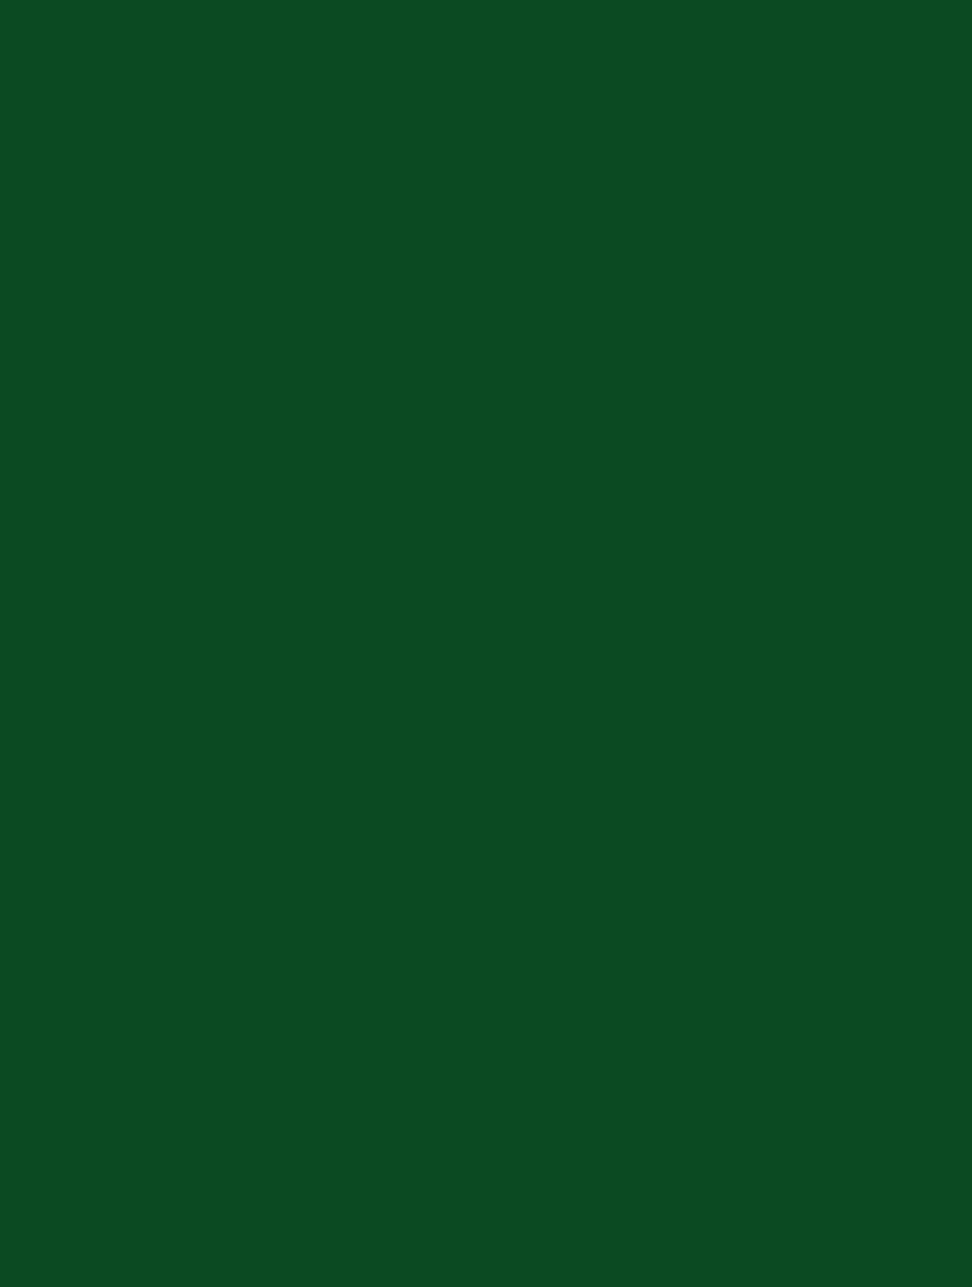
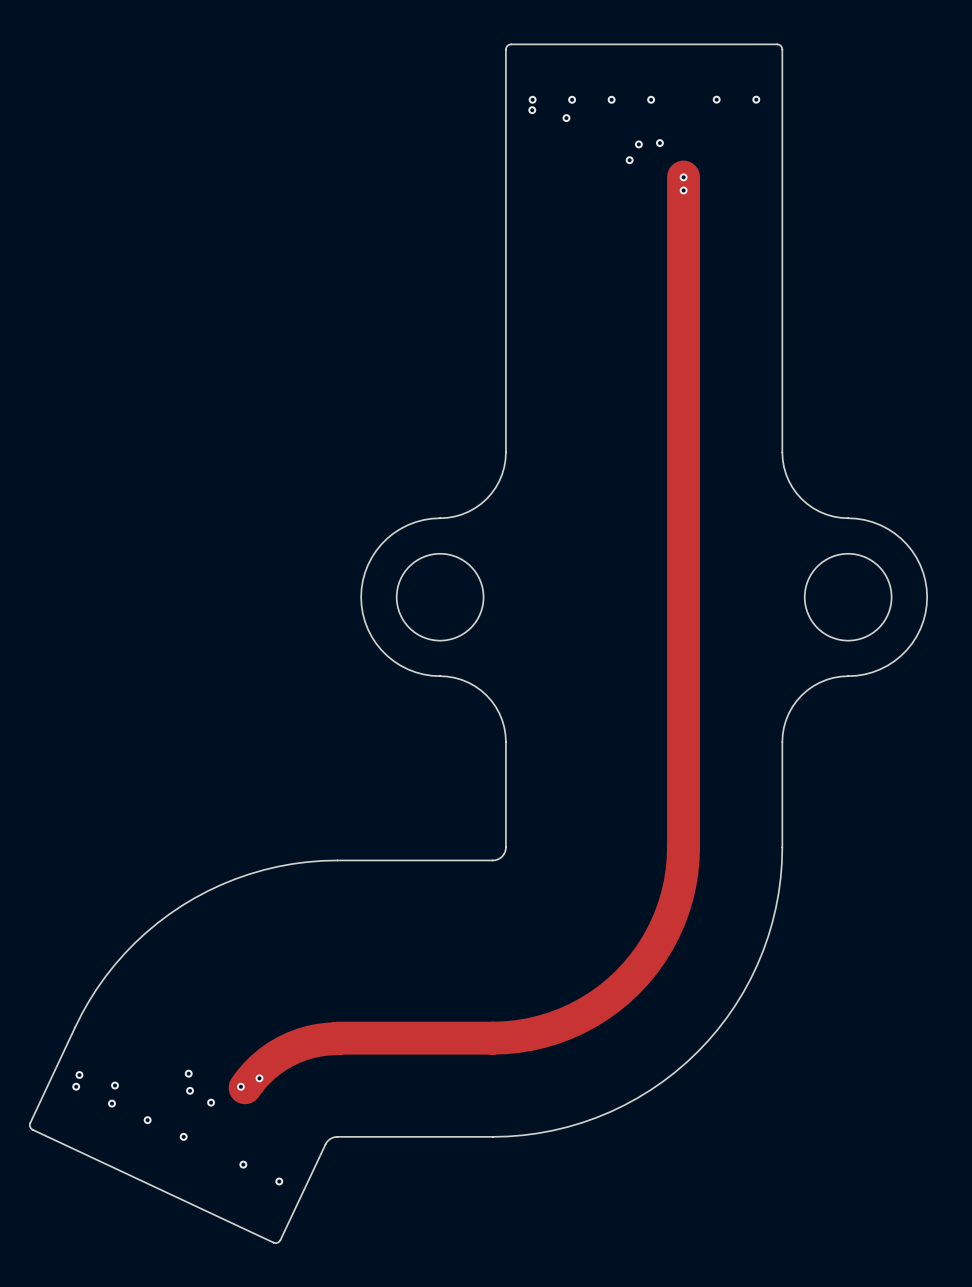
board edge: none -> (511, 44) (777, 44) (781, 46) (782, 452) (783, 467) (788, 480) (796, 493) (813, 508) (833, 516) (864, 519) (880, 525) (894, 533) (906, 544) (916, 557) (925, 580) (927, 597) (925, 613) (916, 636) (906, 650) (894, 661) (872, 672) (833, 677) (819, 682) (801, 695) (788, 713) (783, 727) (782, 741) (781, 862) (778, 892) (772, 922) (763, 951) (743, 992) (717, 1029) (697, 1052) (662, 1081) (624, 1105) (596, 1117) (552, 1130) (507, 1136) (331, 1138) (325, 1144) (280, 1240) (274, 1242) (32, 1129) (29, 1124) (81, 1014) (105, 976) (124, 953) (146, 932) (169, 914) (194, 898) (235, 879) (263, 870) (292, 863) (337, 860) (492, 860) (499, 858) (504, 853) (505, 734) (502, 720) (495, 706) (486, 695) (468, 682) (454, 677) (415, 672) (400, 665) (387, 655) (376, 643) (367, 629) (362, 613) (361, 597) (362, 580) (367, 565) (376, 550) (387, 538) (400, 528) (415, 522) (454, 516) (475, 508) (486, 498) (495, 487) (504, 467) (505, 452) (505, 49) (507, 45) (511, 44)
via: none -> (532, 99)
via: none -> (572, 99)
via: none -> (611, 99)
via: none -> (651, 99)
via: none -> (716, 99)
via: none -> (756, 99)
via: none -> (532, 110)
via: none -> (566, 118)
via: none -> (659, 143)
via: none -> (638, 144)
via: none -> (629, 160)
track: none -> (683, 177) (683, 847) (679, 884) (669, 920) (657, 942) (644, 963) (618, 990) (588, 1012) (554, 1028) (529, 1034) (505, 1037) (337, 1038)
via: none -> (683, 177)
via: none -> (683, 190)
round board edge: none -> [396, 553, 484, 641]
round board edge: none -> [804, 553, 892, 641]
track: none -> (337, 1038) (310, 1041) (285, 1051) (262, 1067) (245, 1087)
via: none -> (188, 1073)
via: none -> (79, 1075)
via: none -> (259, 1078)
via: none -> (115, 1085)
via: none -> (76, 1086)
via: none -> (240, 1086)
via: none -> (190, 1090)
via: none -> (211, 1102)
via: none -> (111, 1103)
via: none -> (147, 1120)
via: none -> (183, 1136)
via: none -> (243, 1164)
via: none -> (279, 1181)

